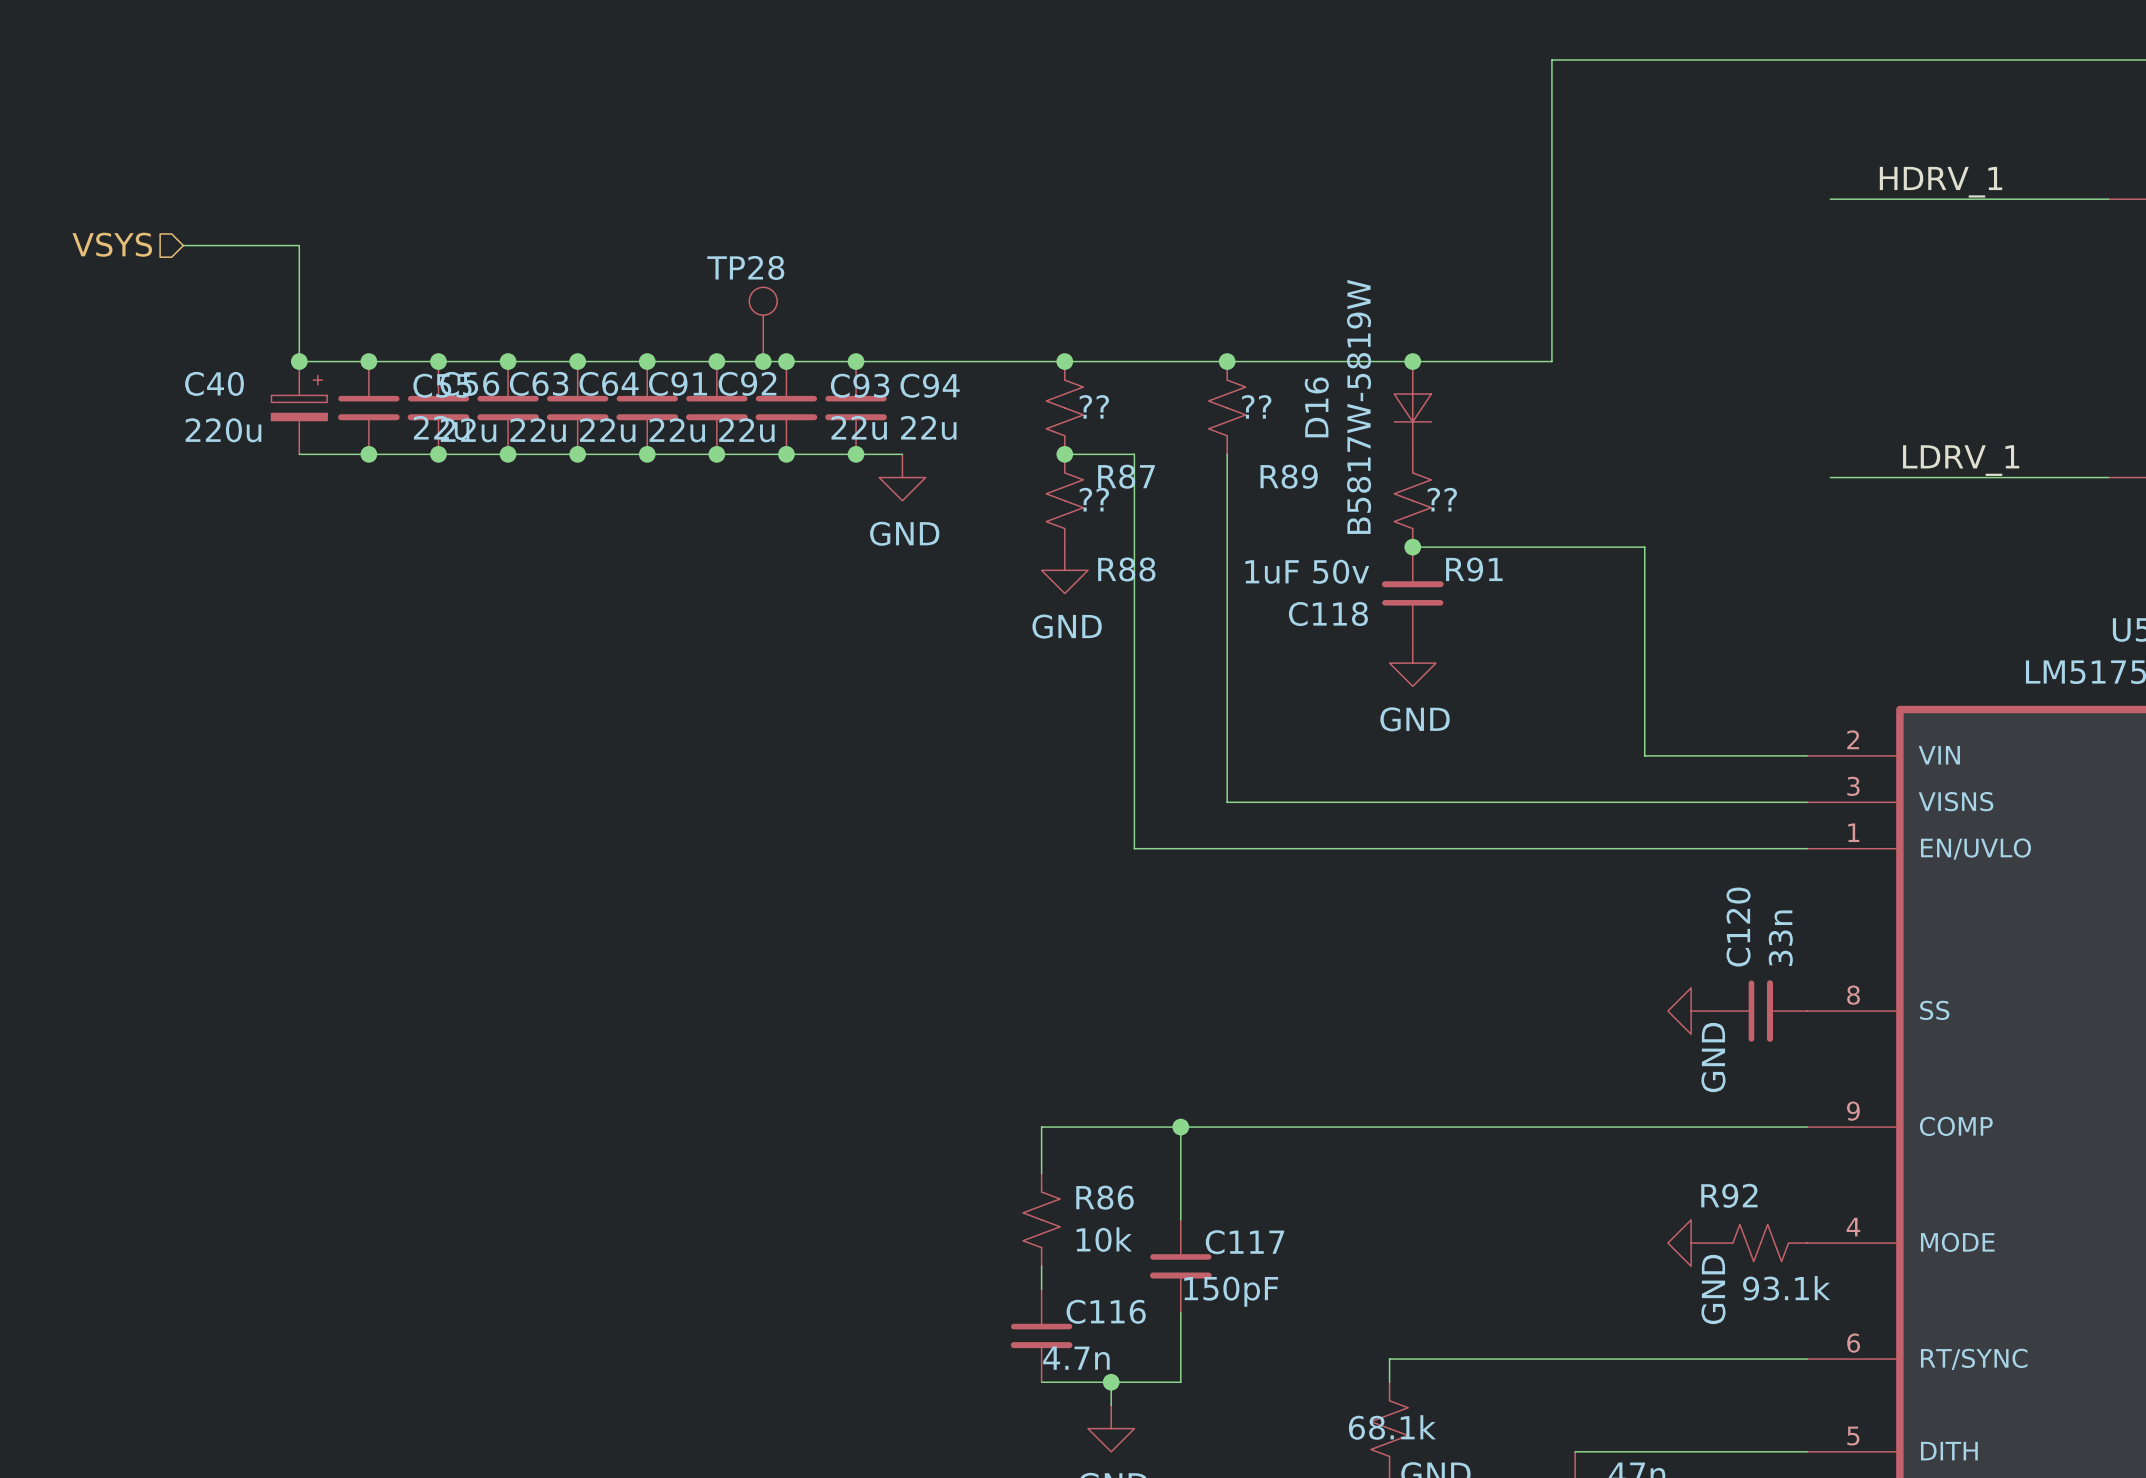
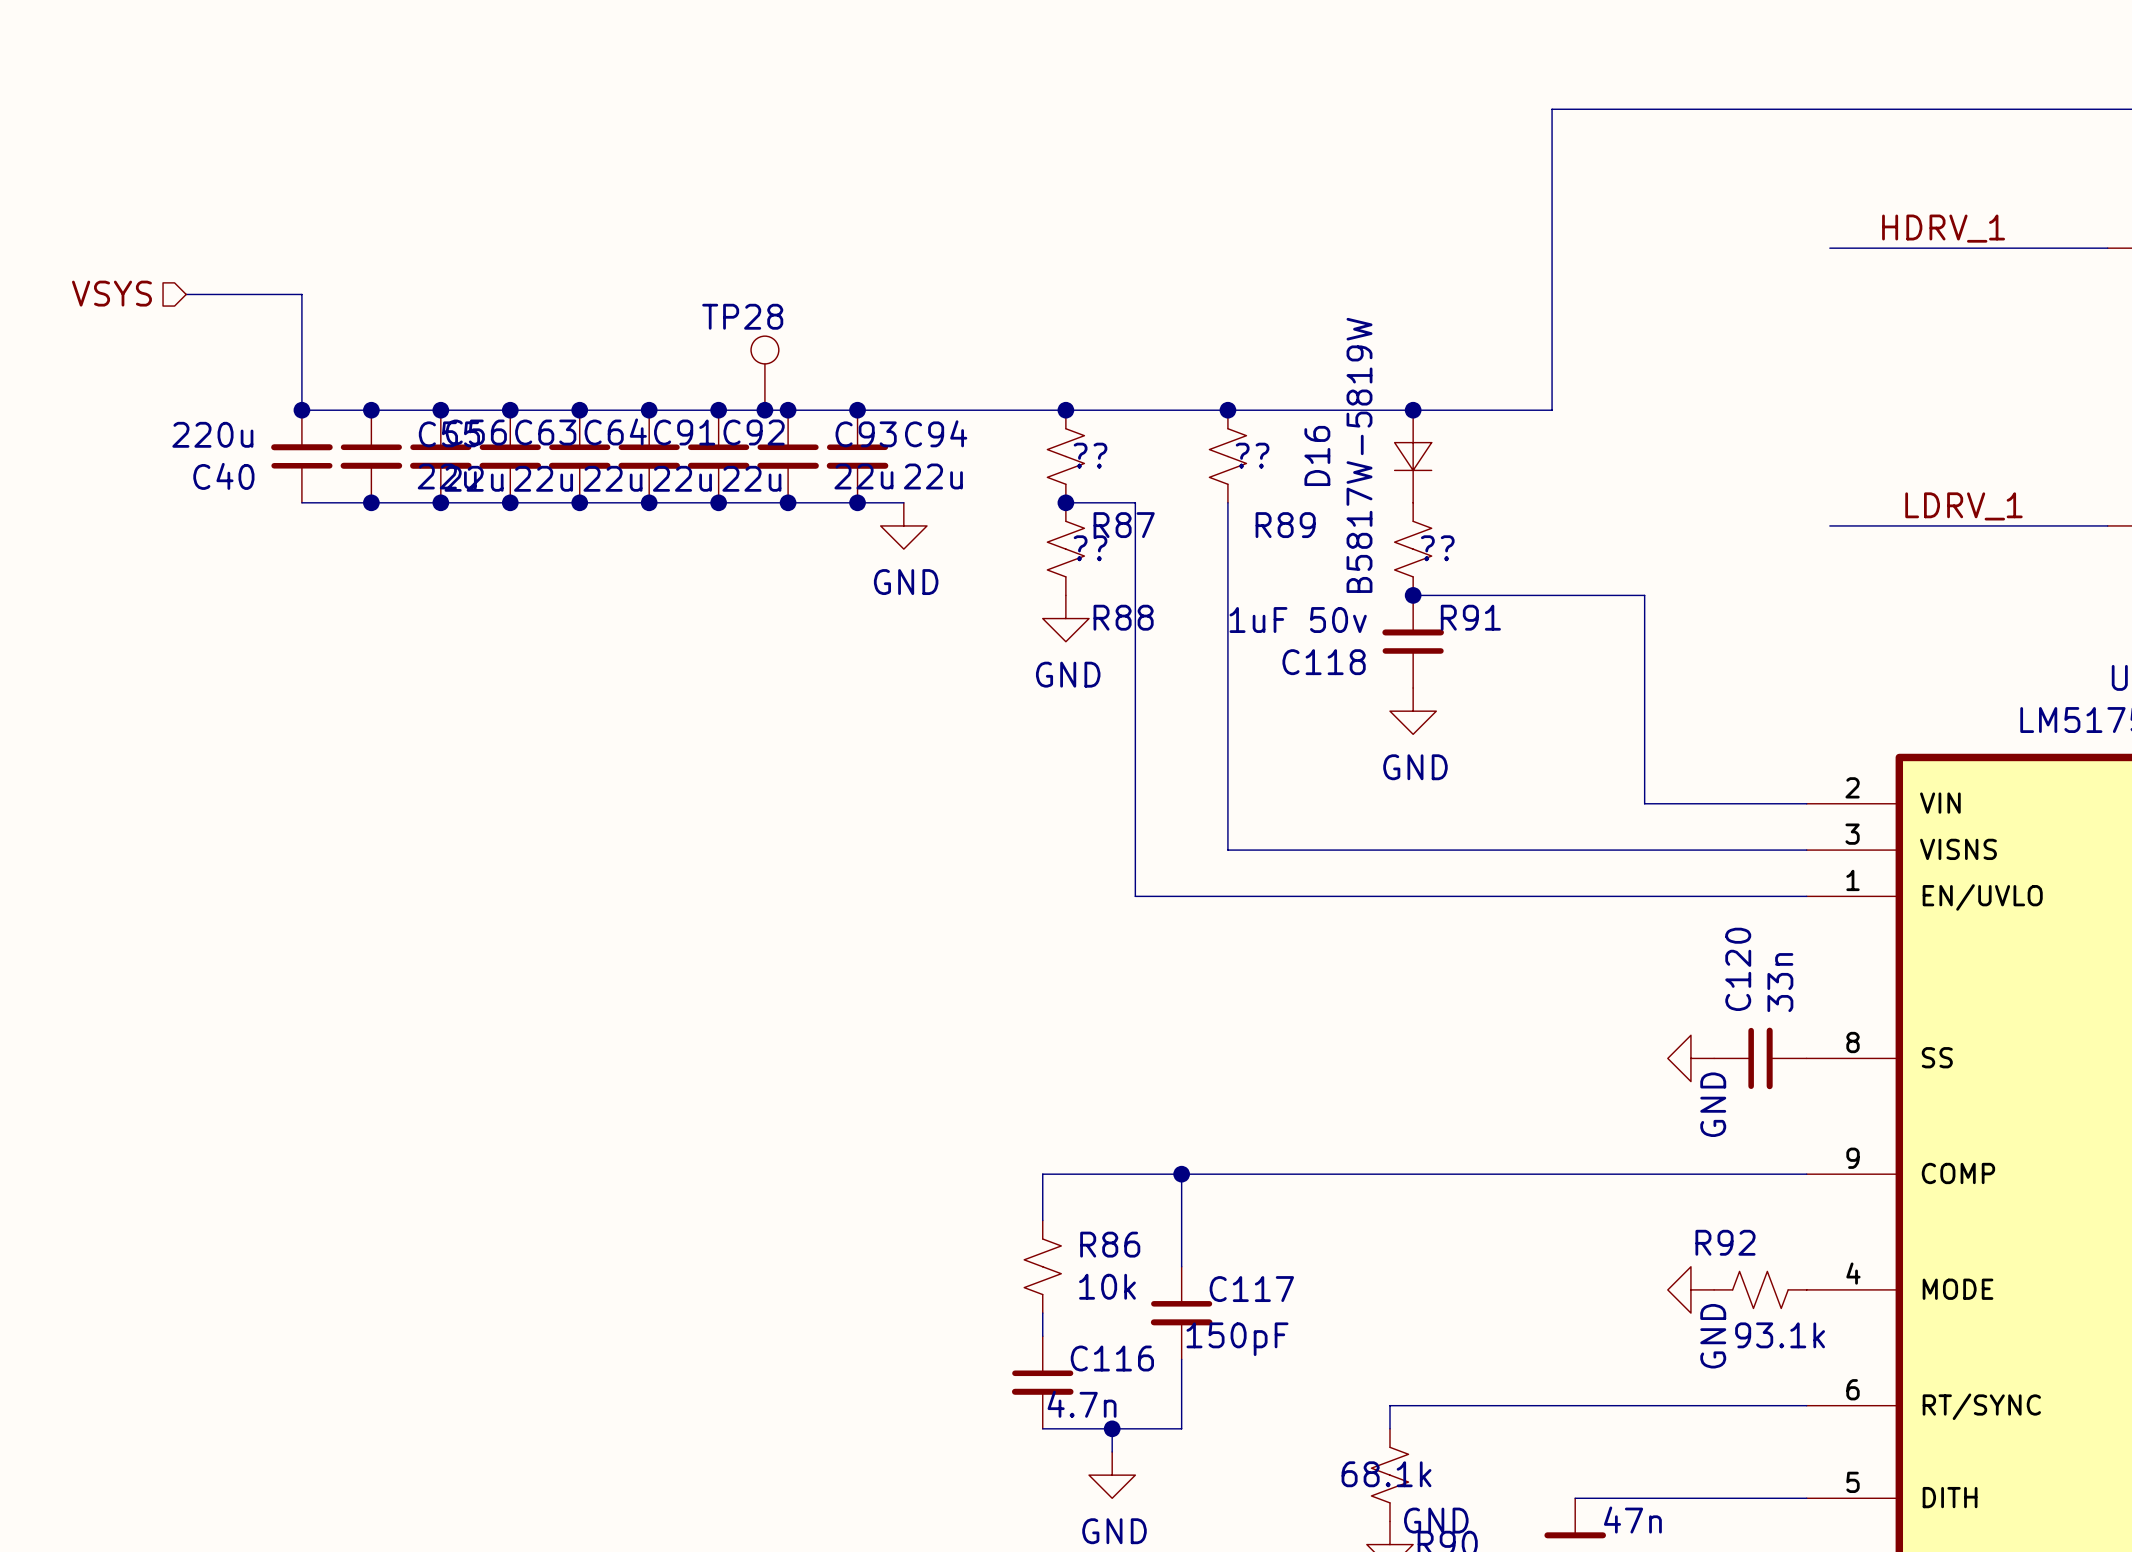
C40 symbol: [271, 361, 328, 455] -> [271, 410, 333, 503]
C40 name position: C40 (214, 383) -> C40 (223, 476)
C40 value position: 220u (223, 430) -> 220u (212, 434)

